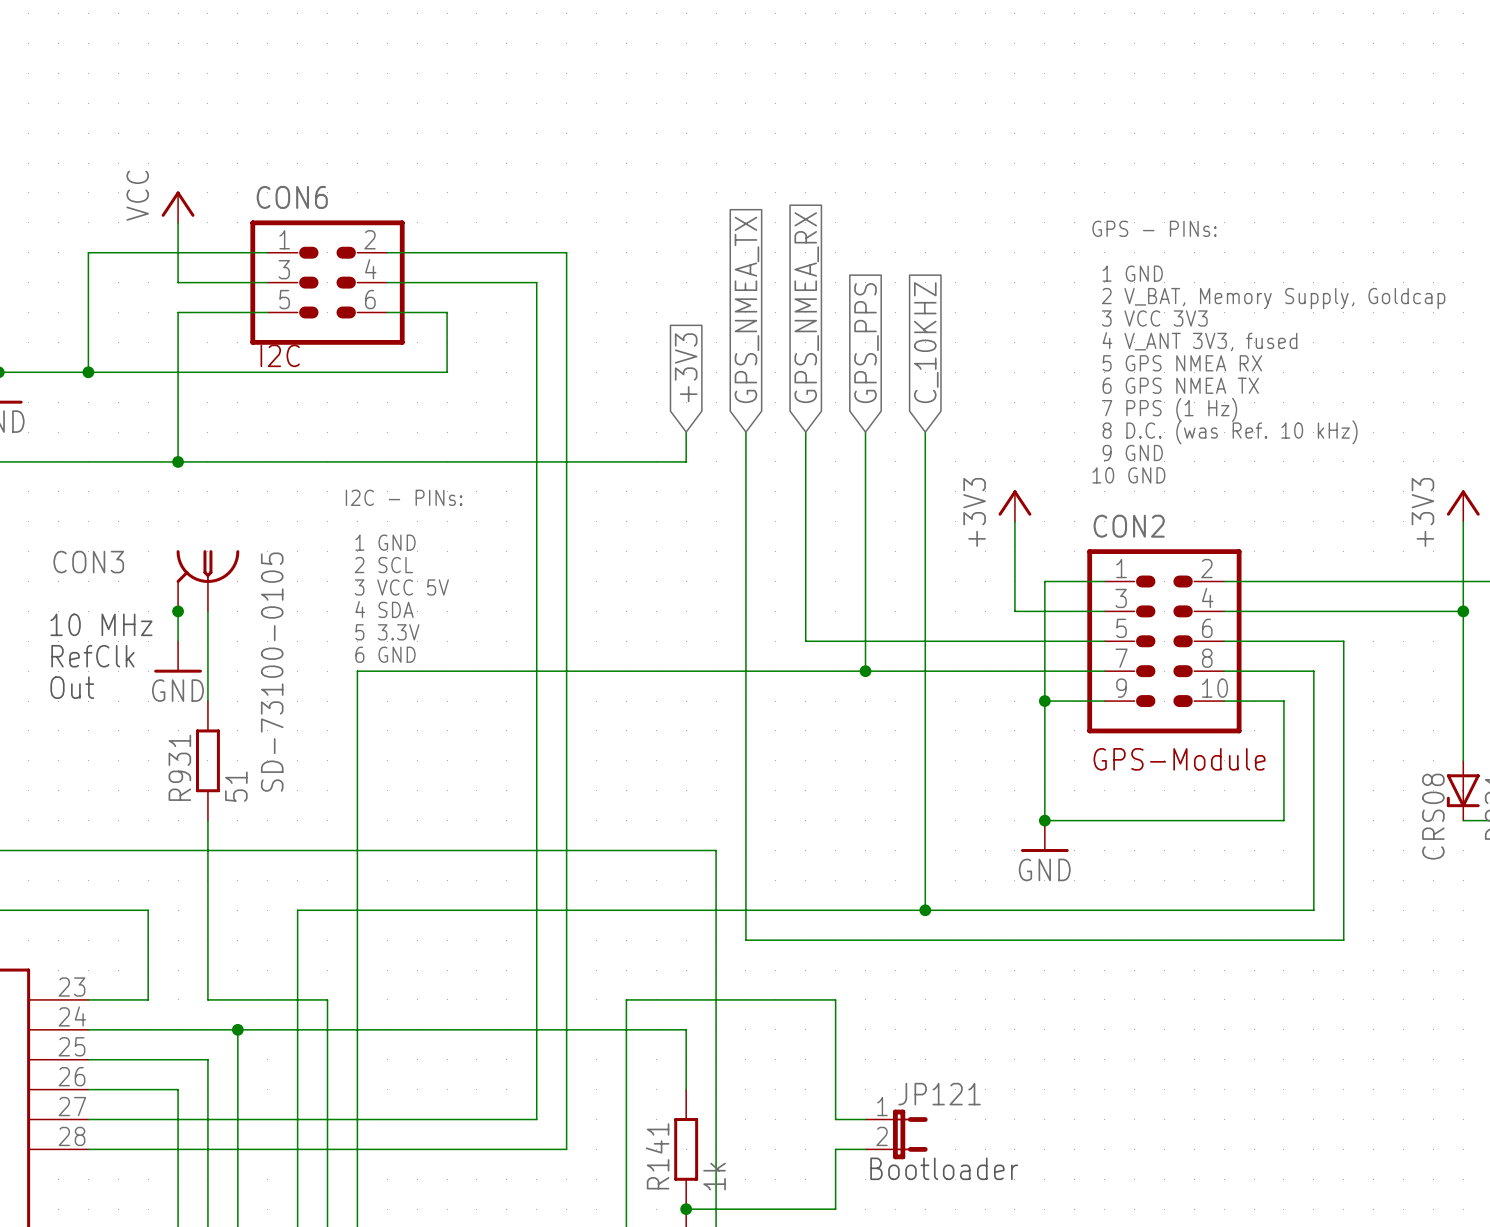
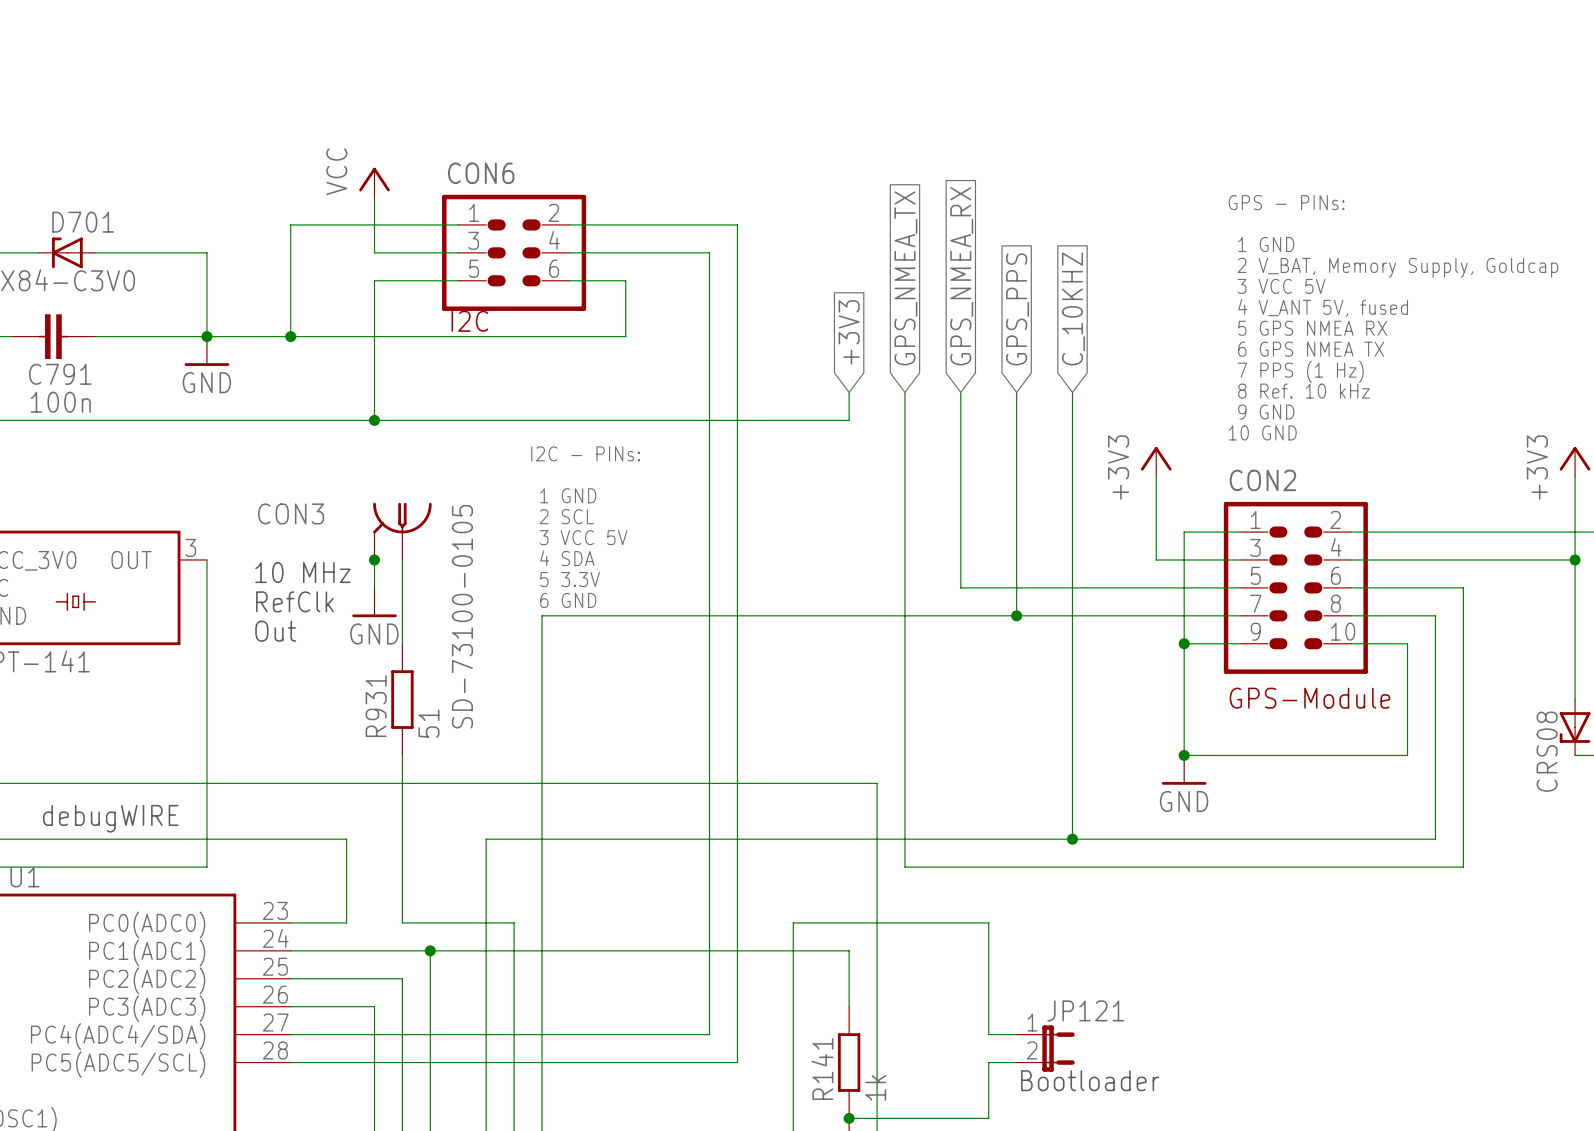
text: 3 VCC 3V3 (1154, 318) -> 3 VCC 5V (1281, 286)
text: 4 V_ANT 3V3, fused (1199, 341) -> 4 V_ANT 5V, fused (1323, 307)
text: 8 D.C. (was Ref. 10 kHz) (1230, 432) -> 8 Ref. 10 kHz (1303, 391)

